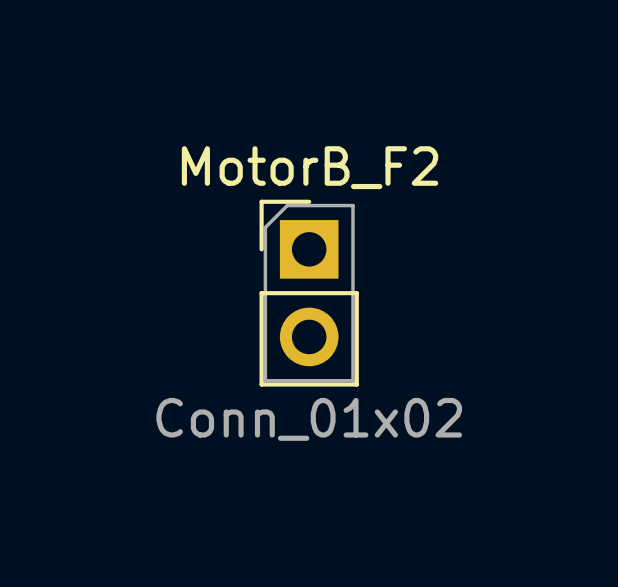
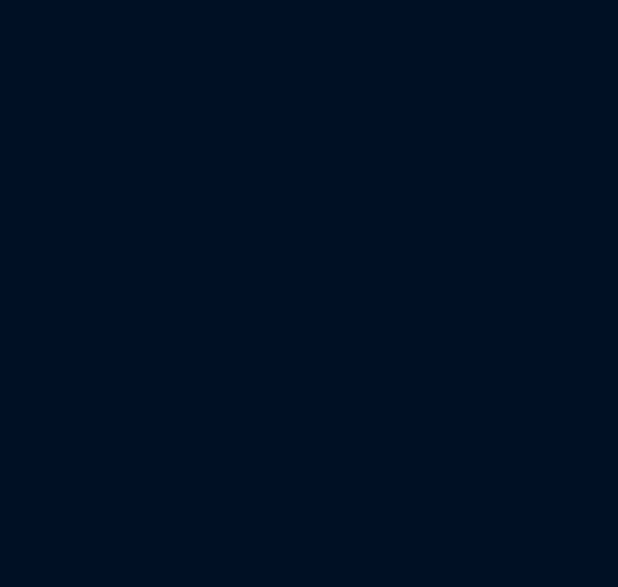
MotorB_F2: Conn_01x02 (309, 293) -> none

